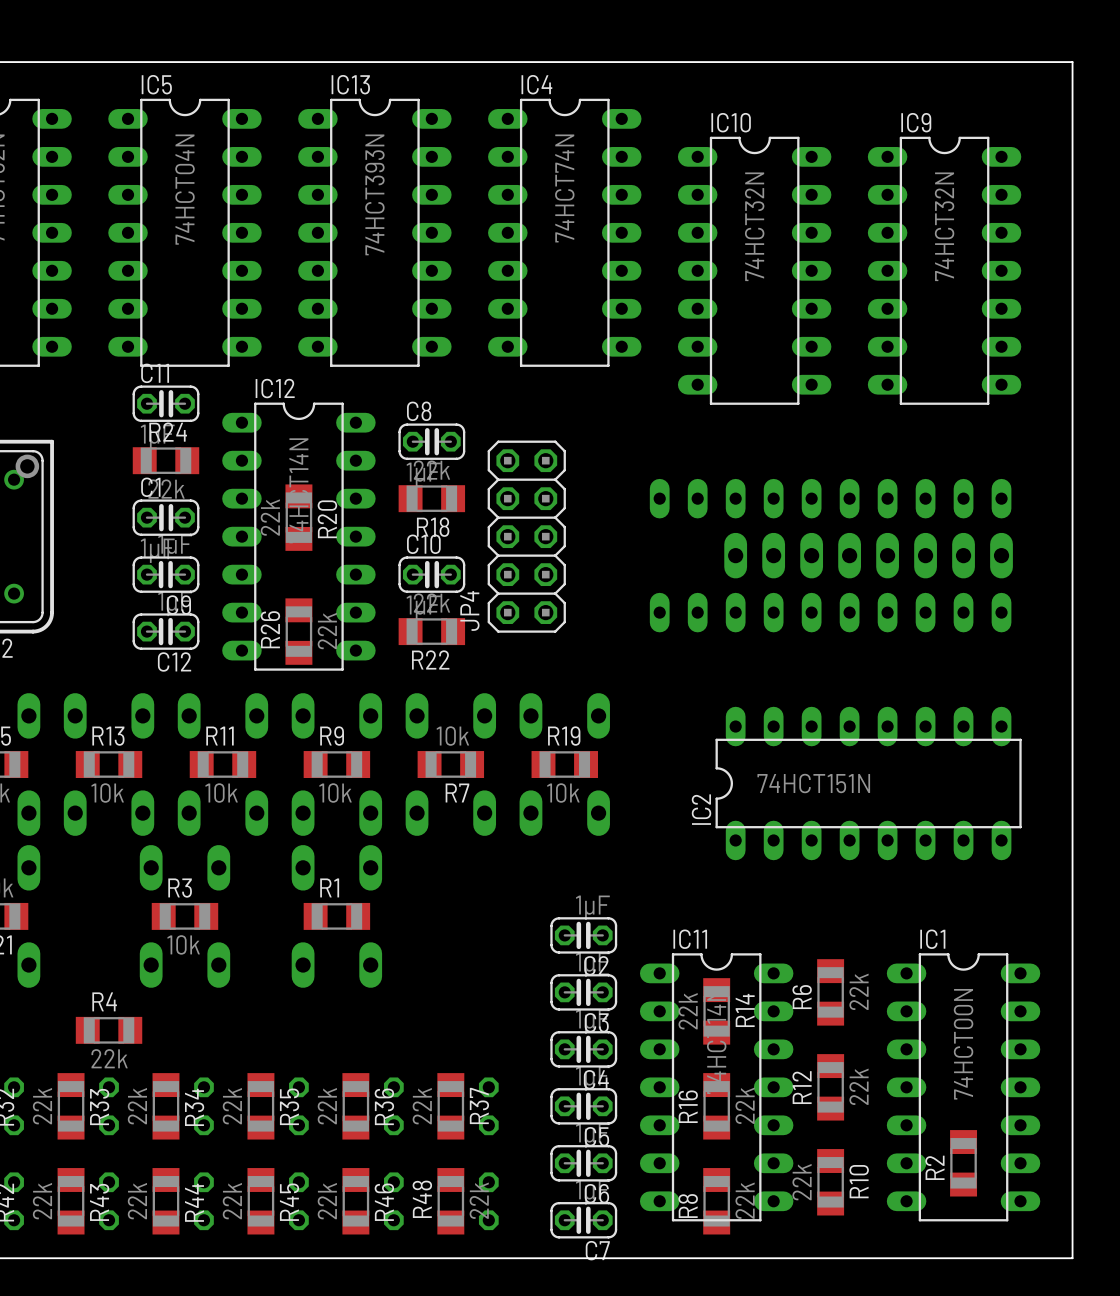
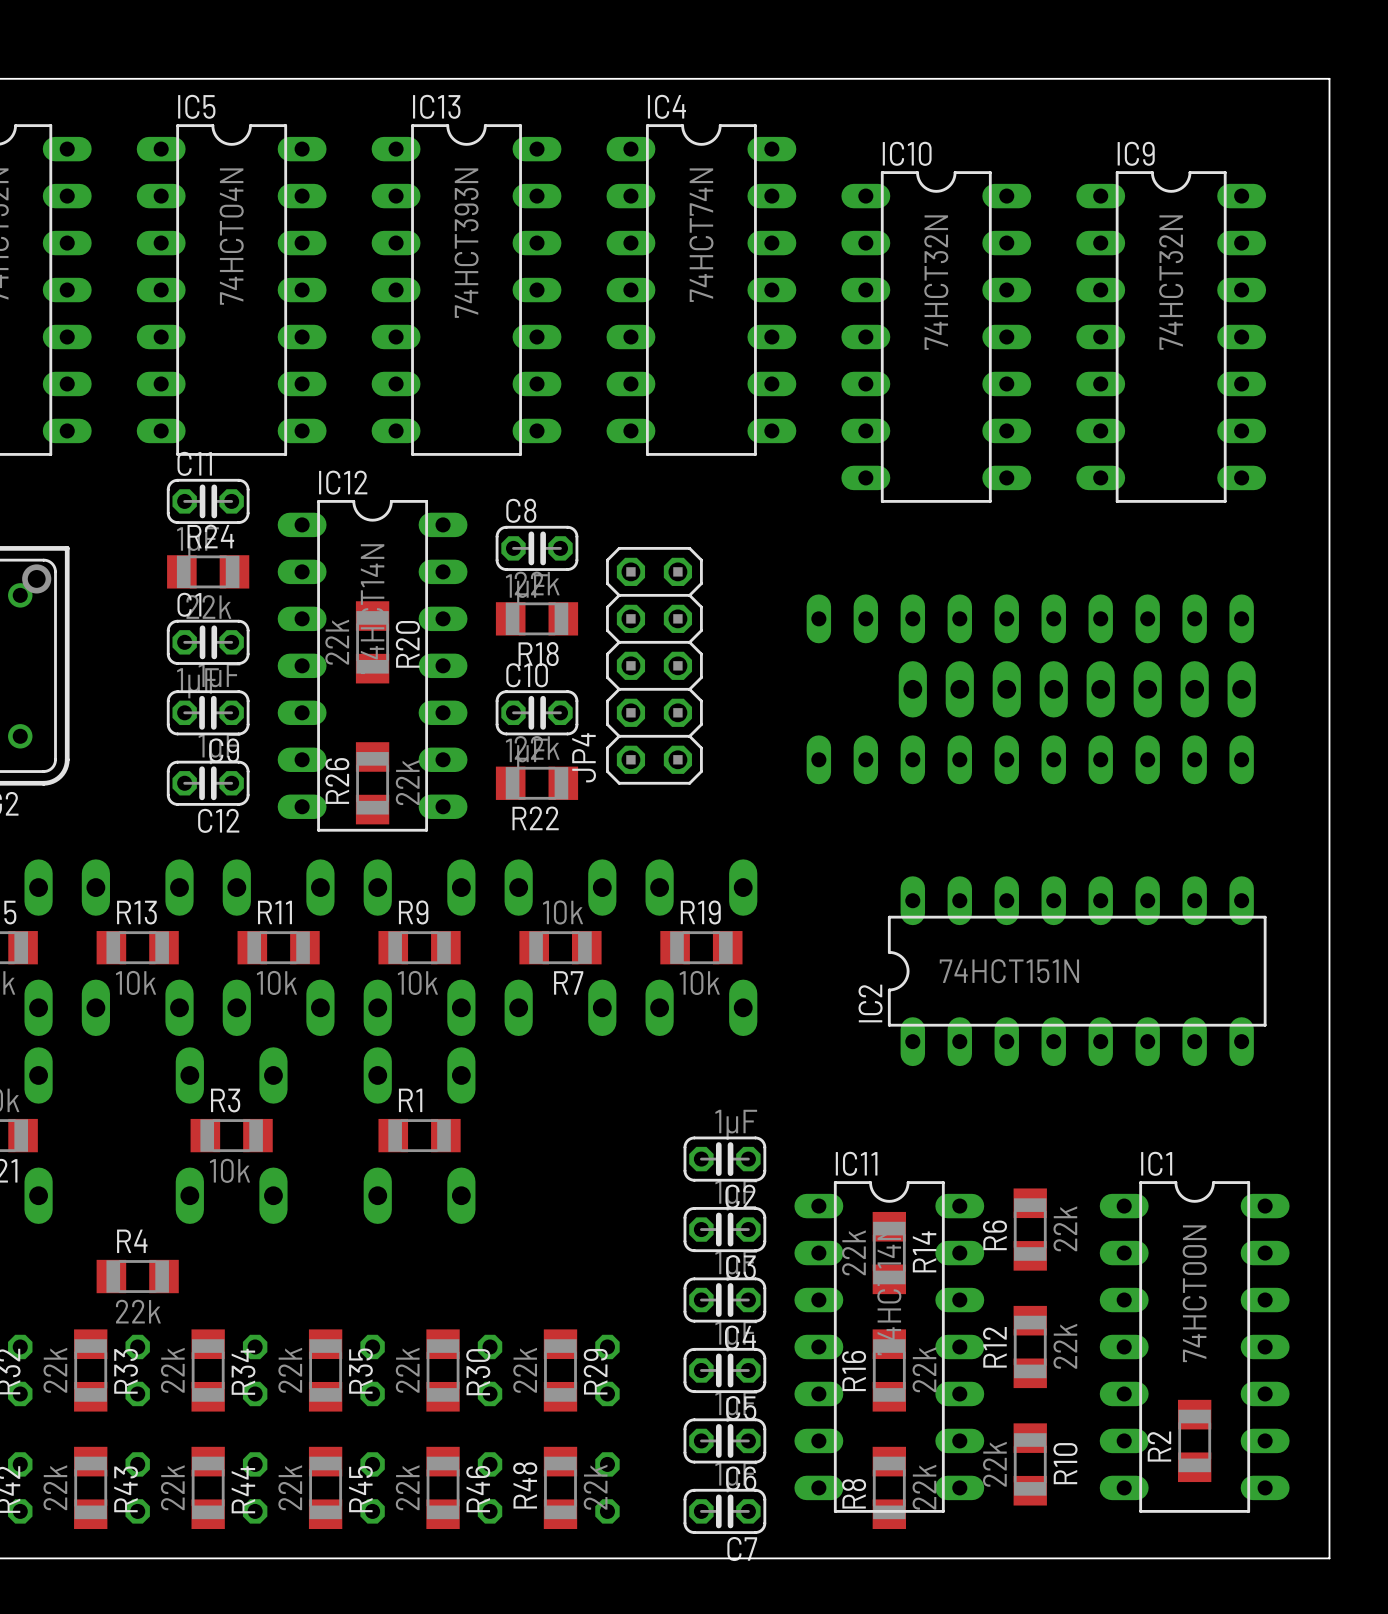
R37 name: R37 (479, 1105) -> R29 (595, 1371)
R36 name: R36 (384, 1106) -> R30 (478, 1372)

